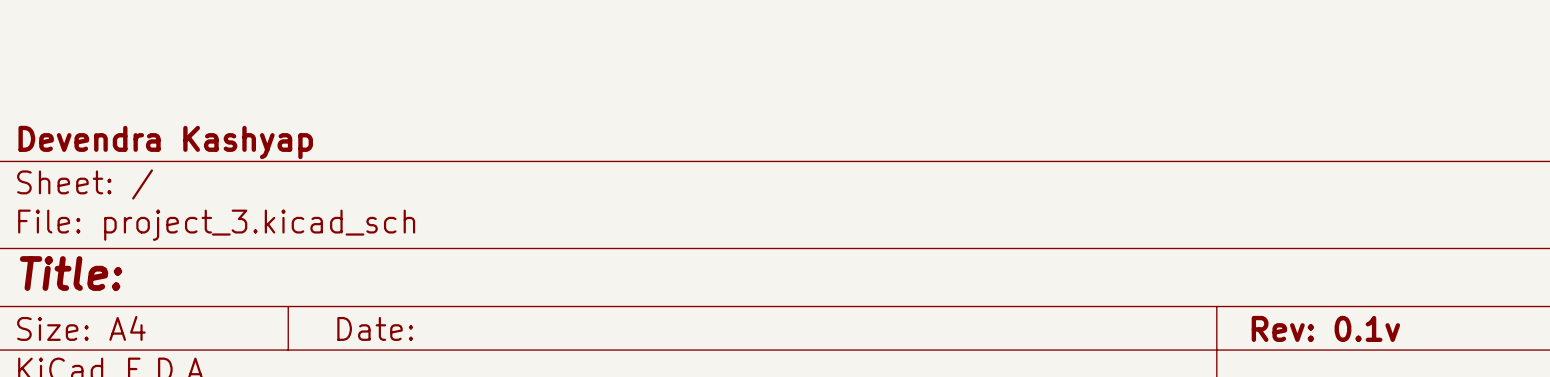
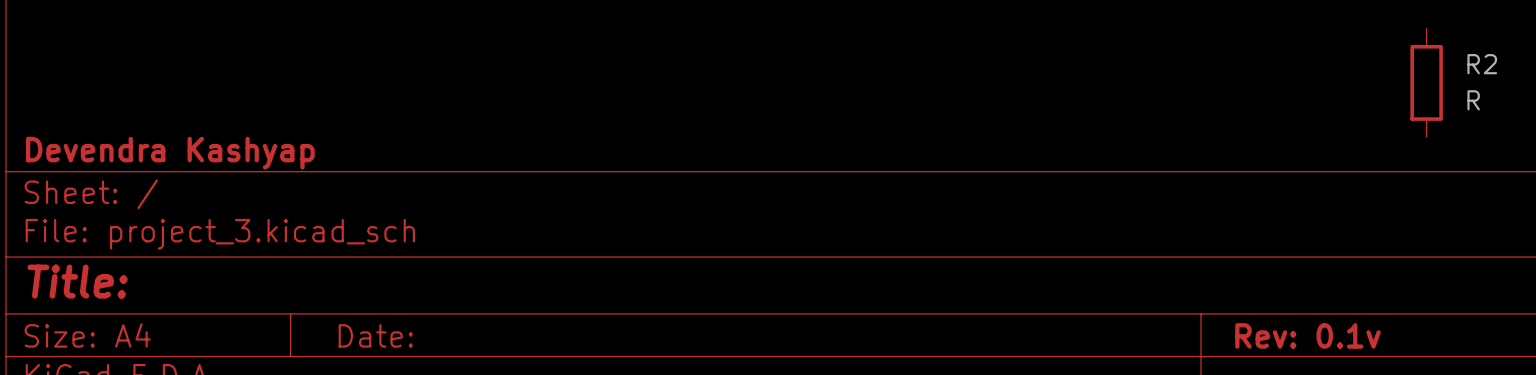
R2: none -> R (1426, 82)

